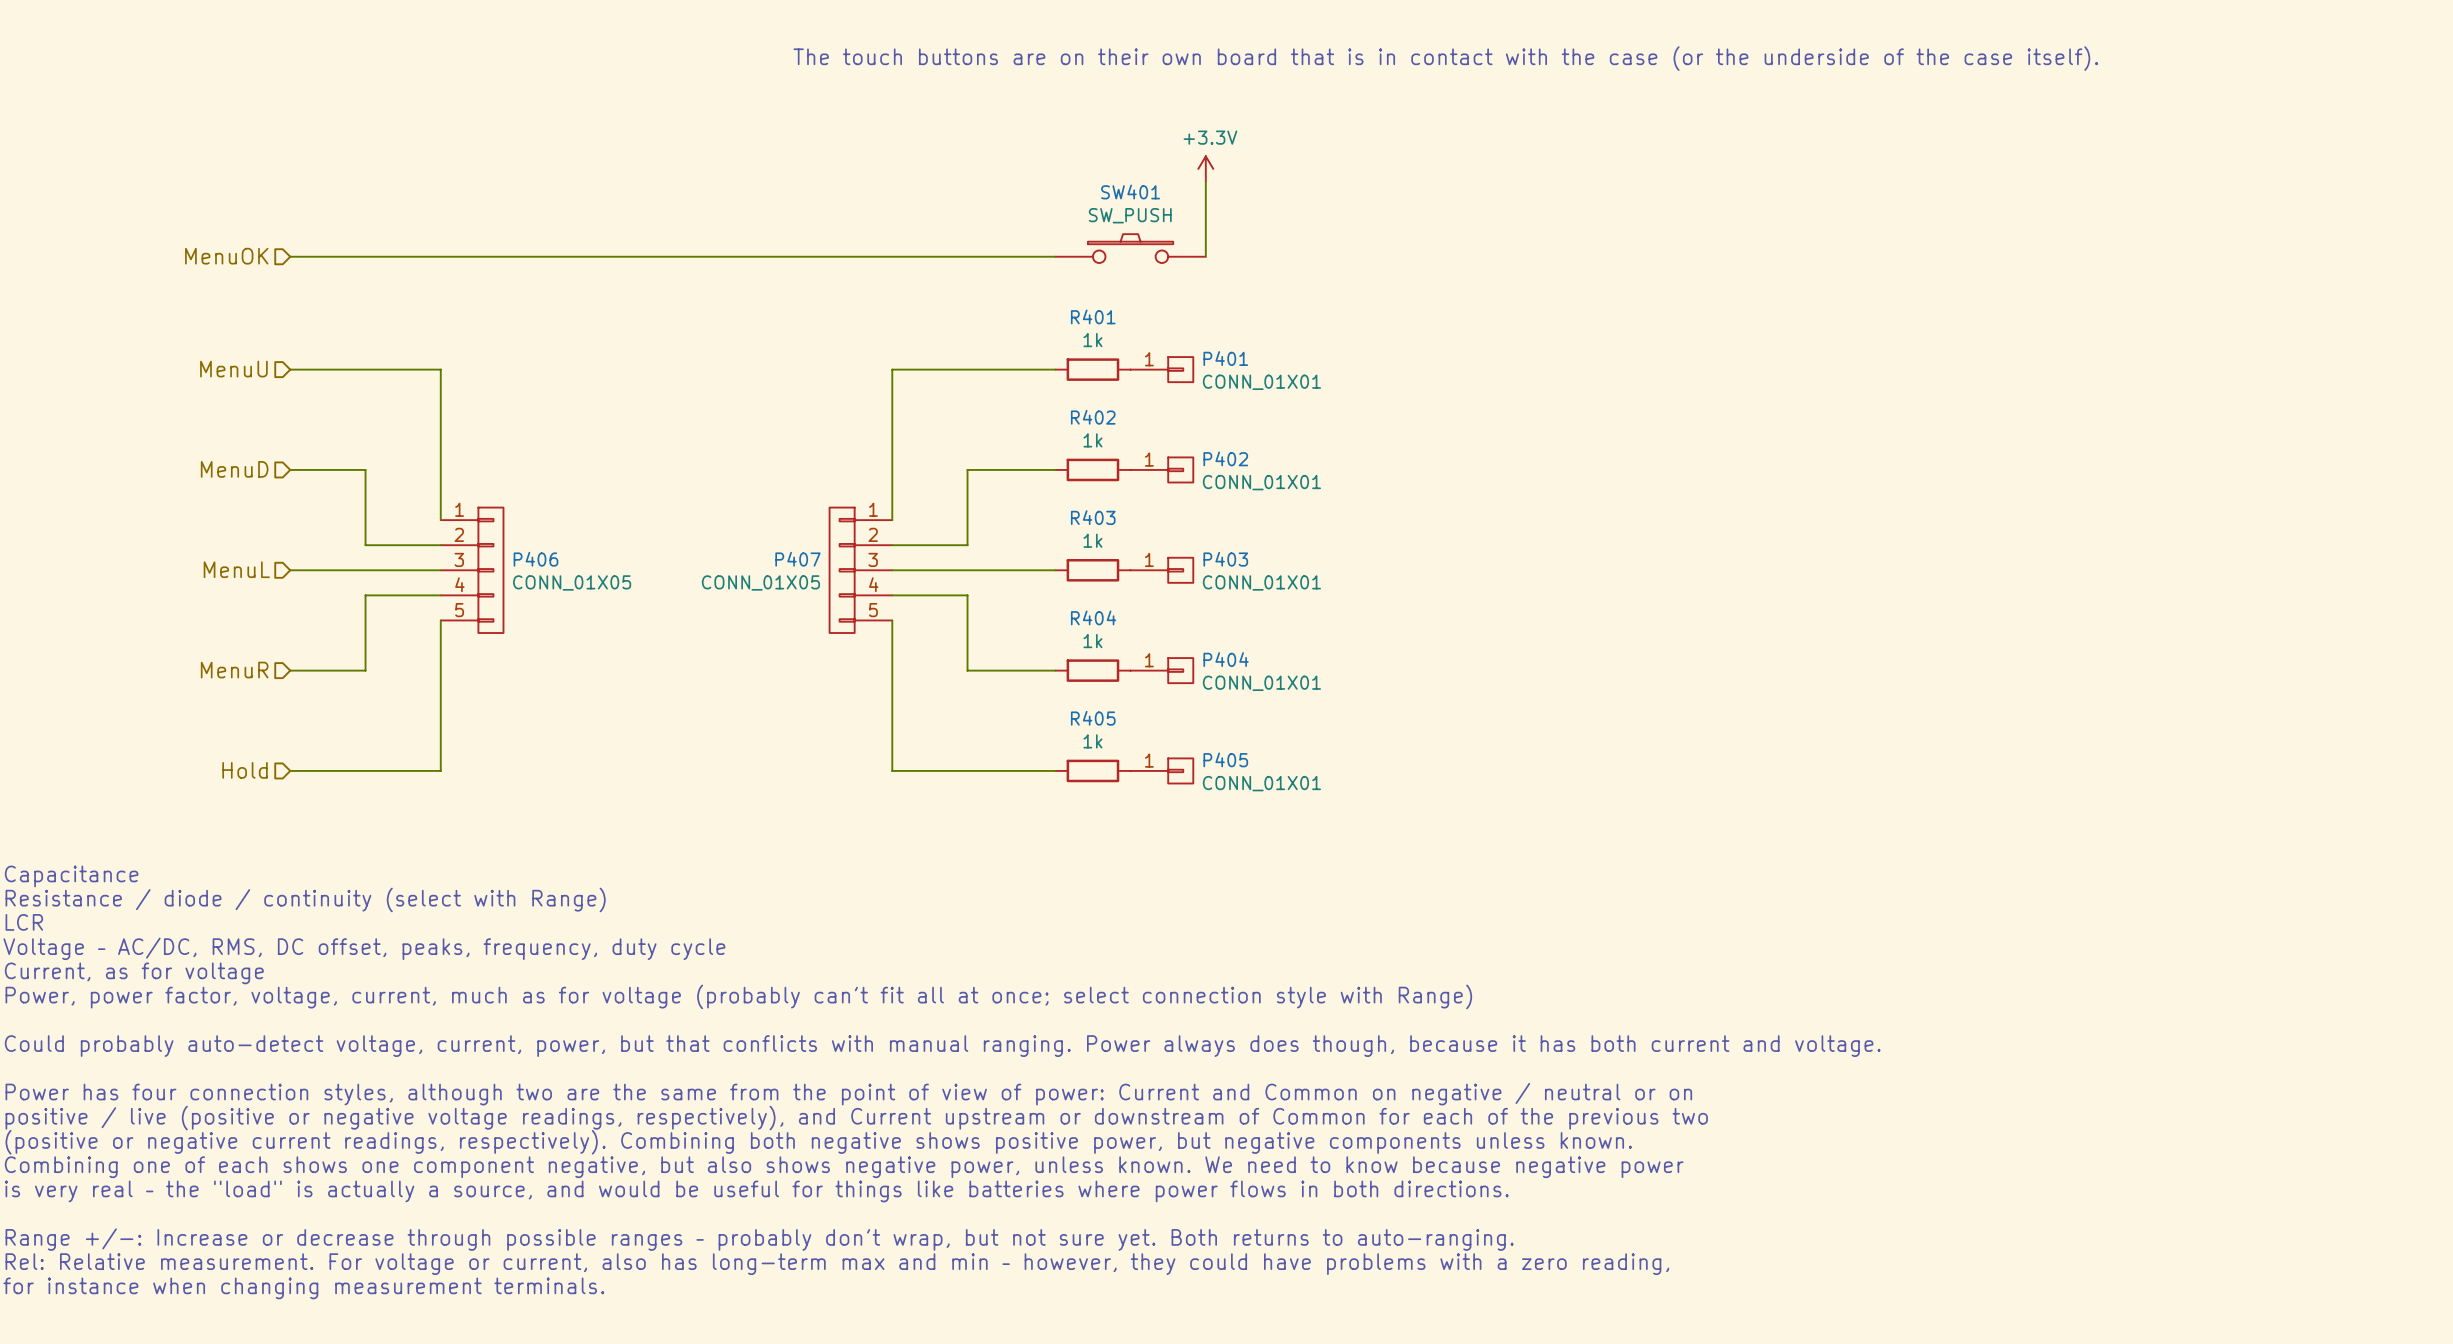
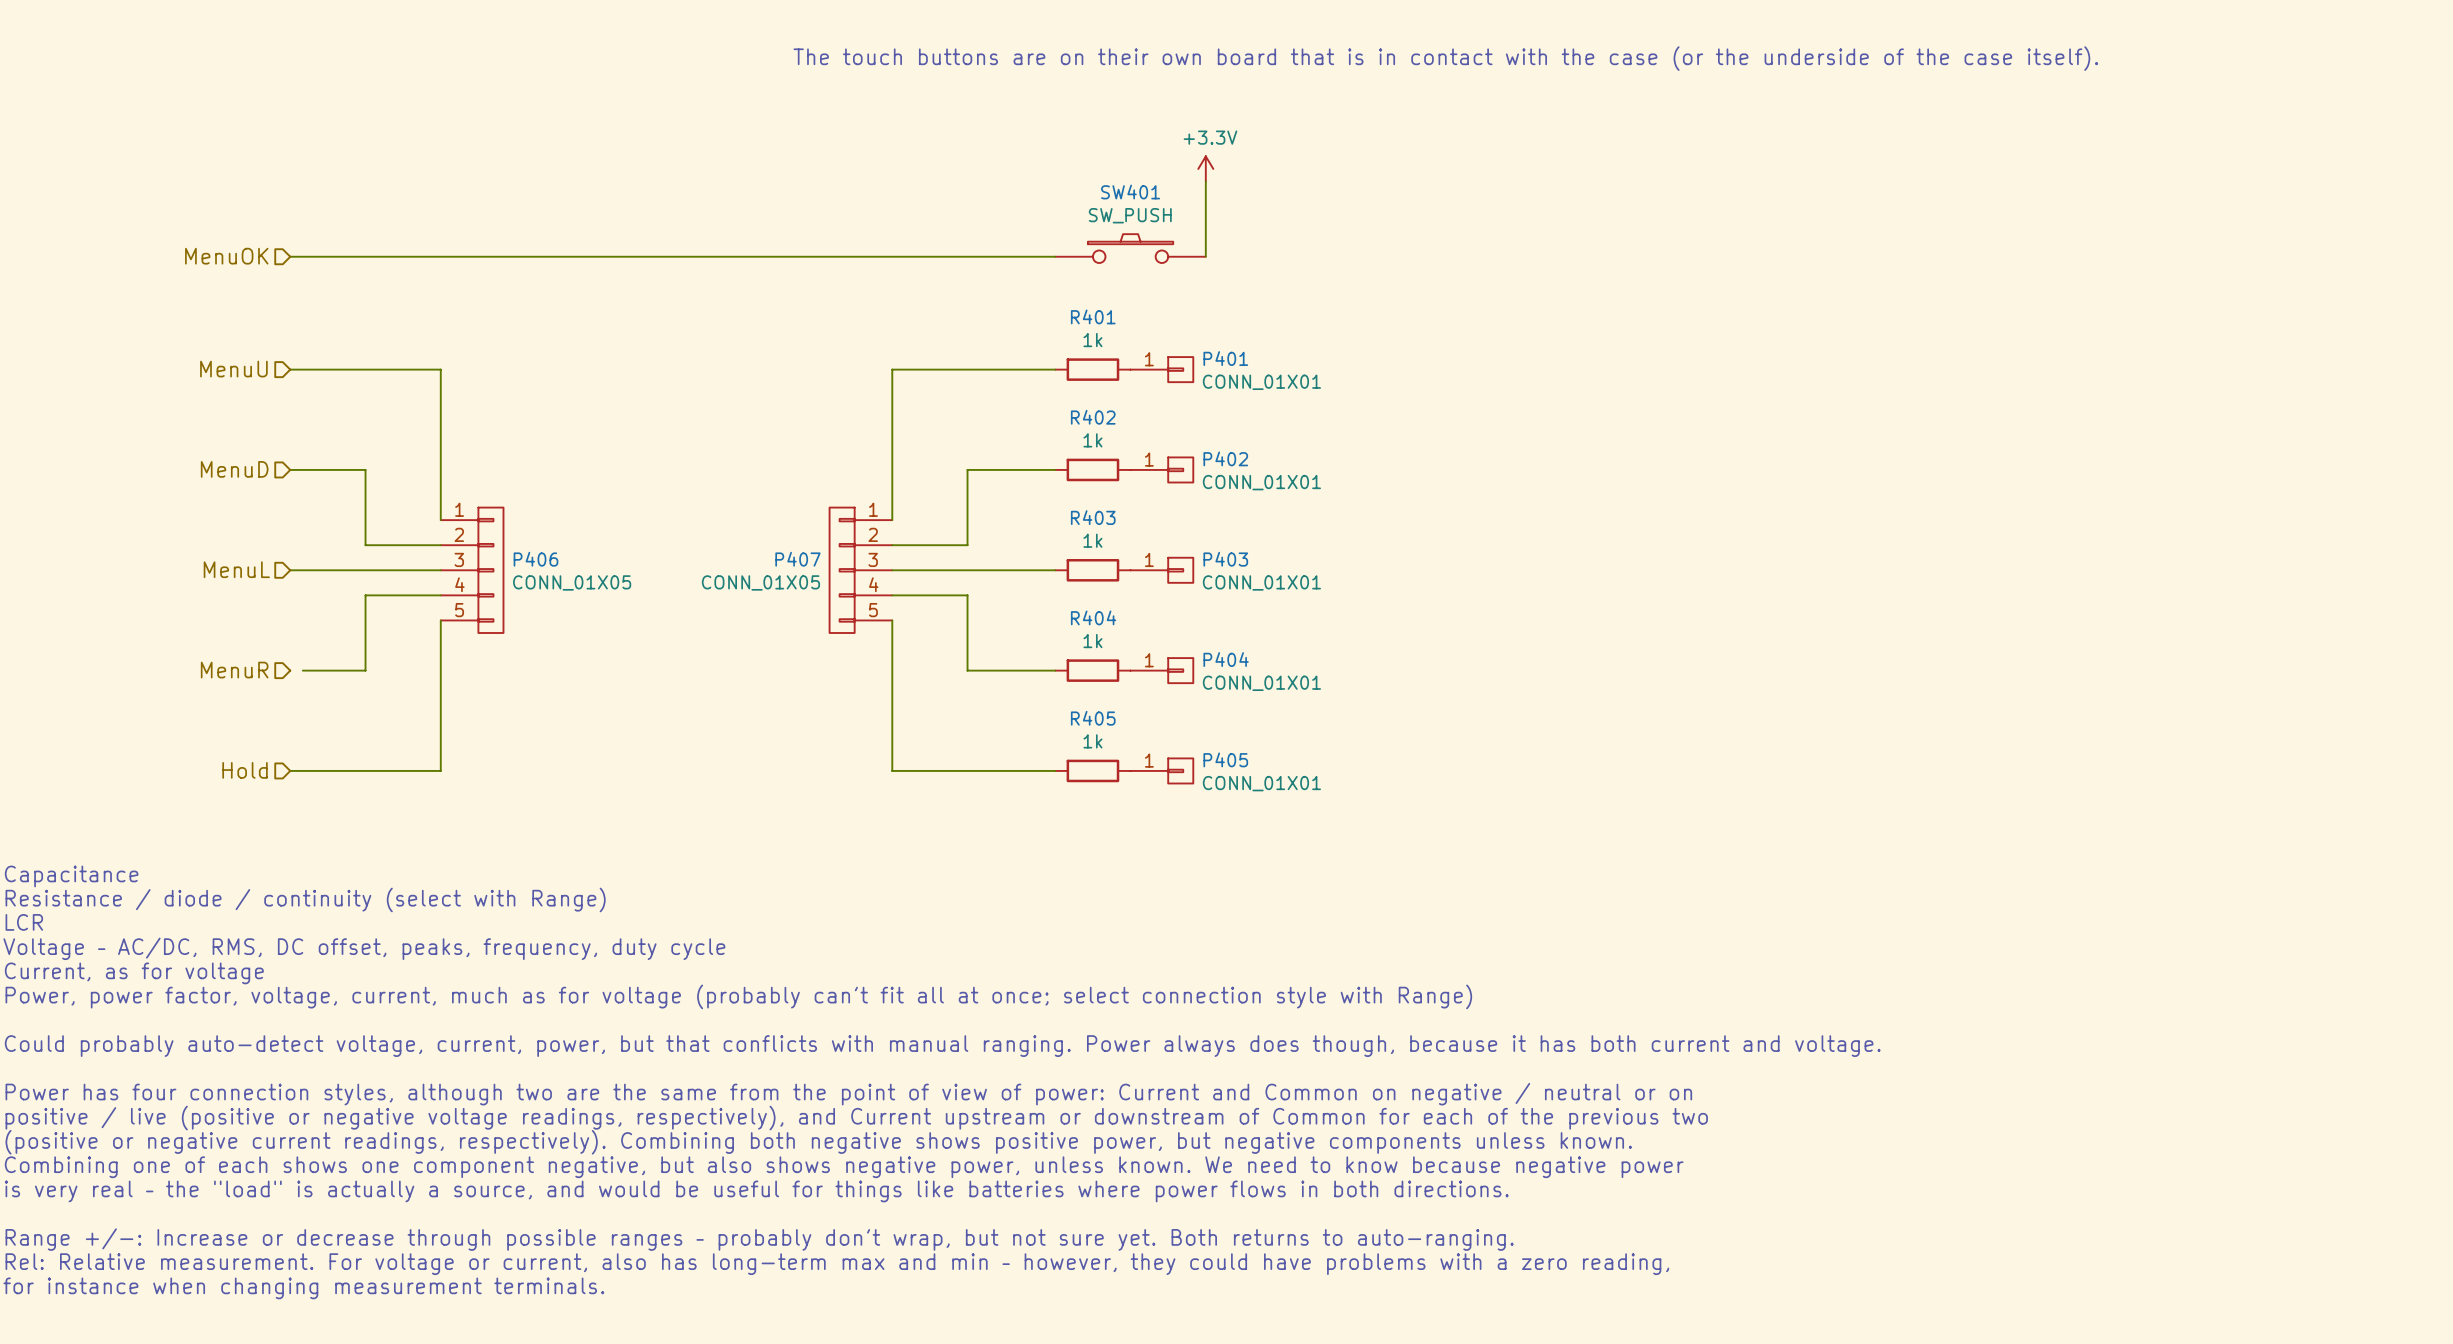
wire: (290, 670) (302, 670) -> none

